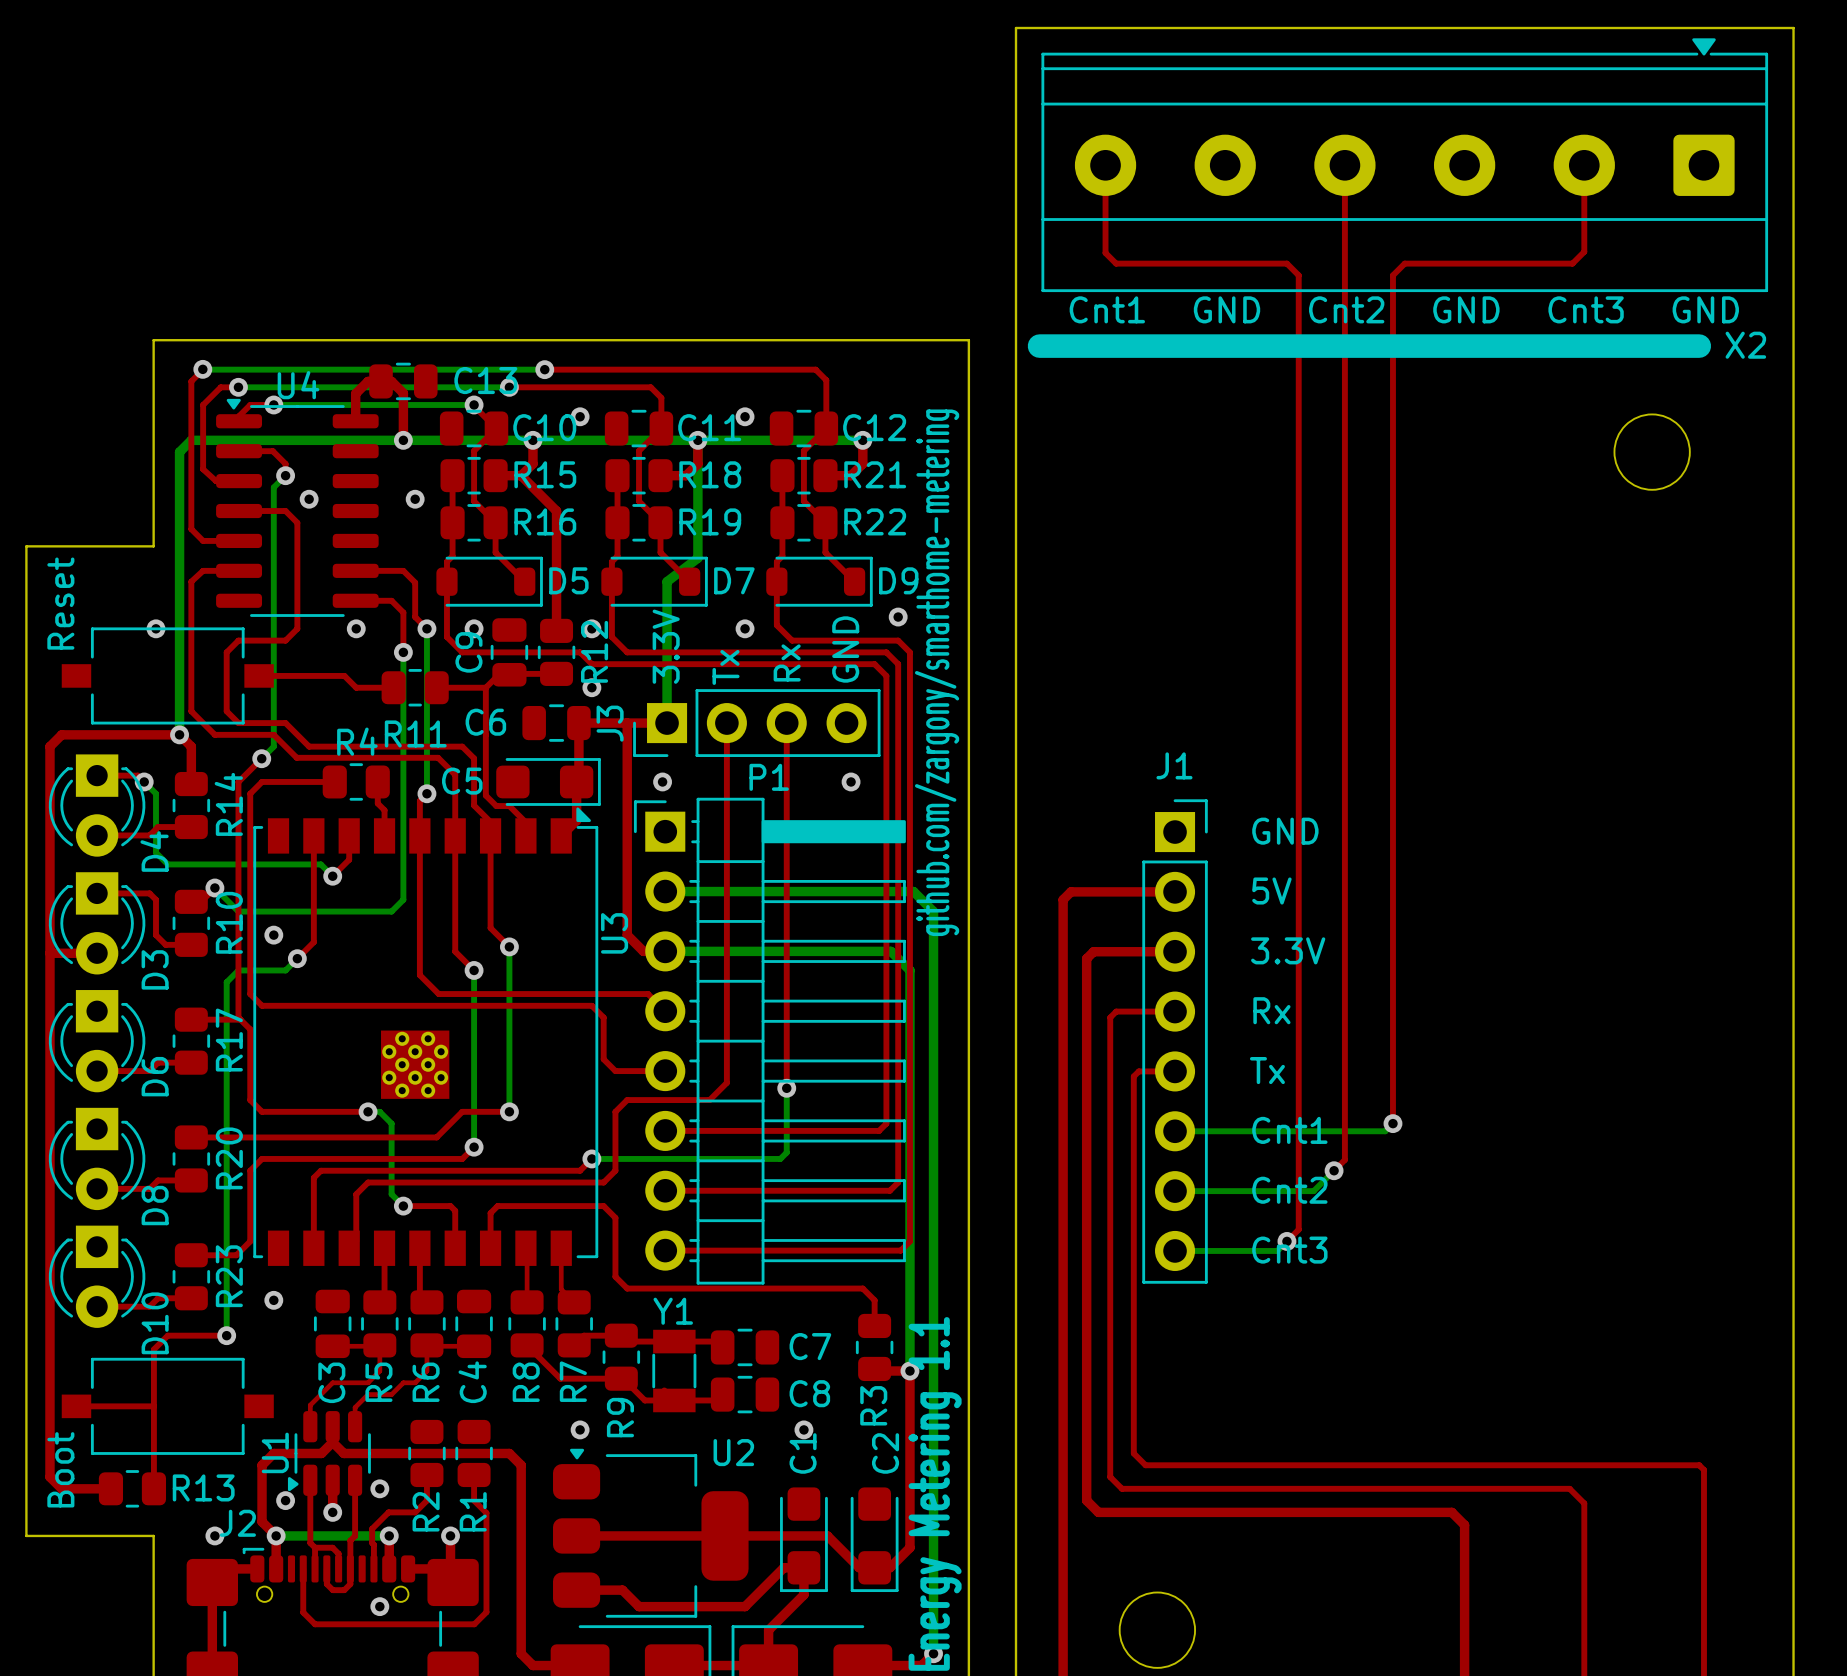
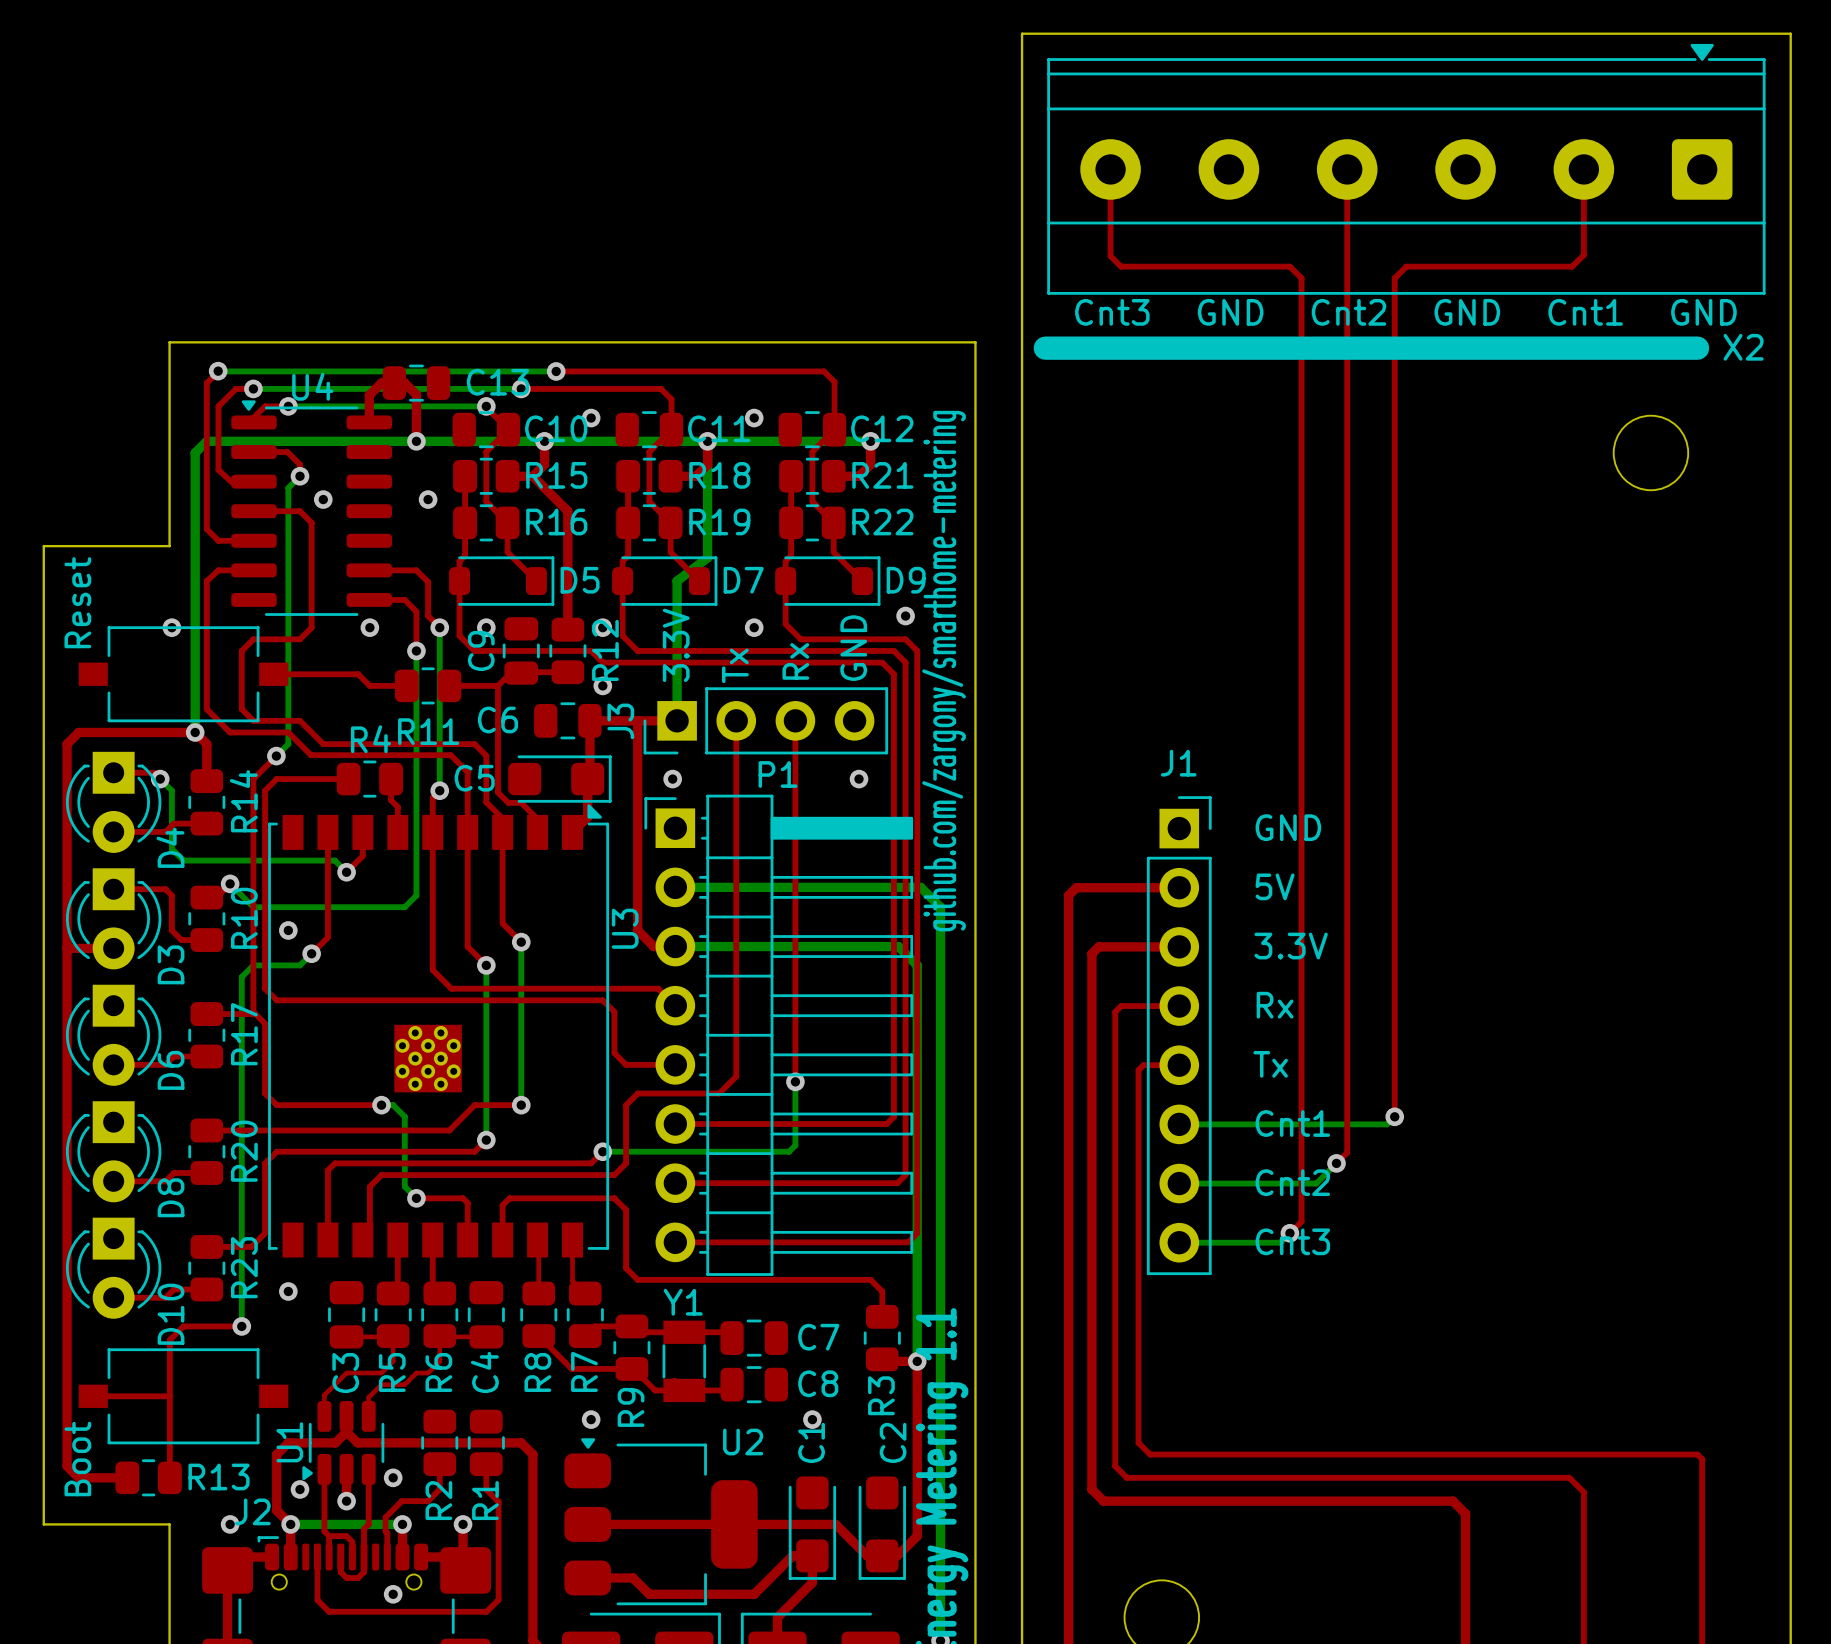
text: Cnt1 (1107, 309) -> Cnt3 (1112, 312)
text: Cnt3 (1586, 309) -> Cnt1 (1585, 312)

